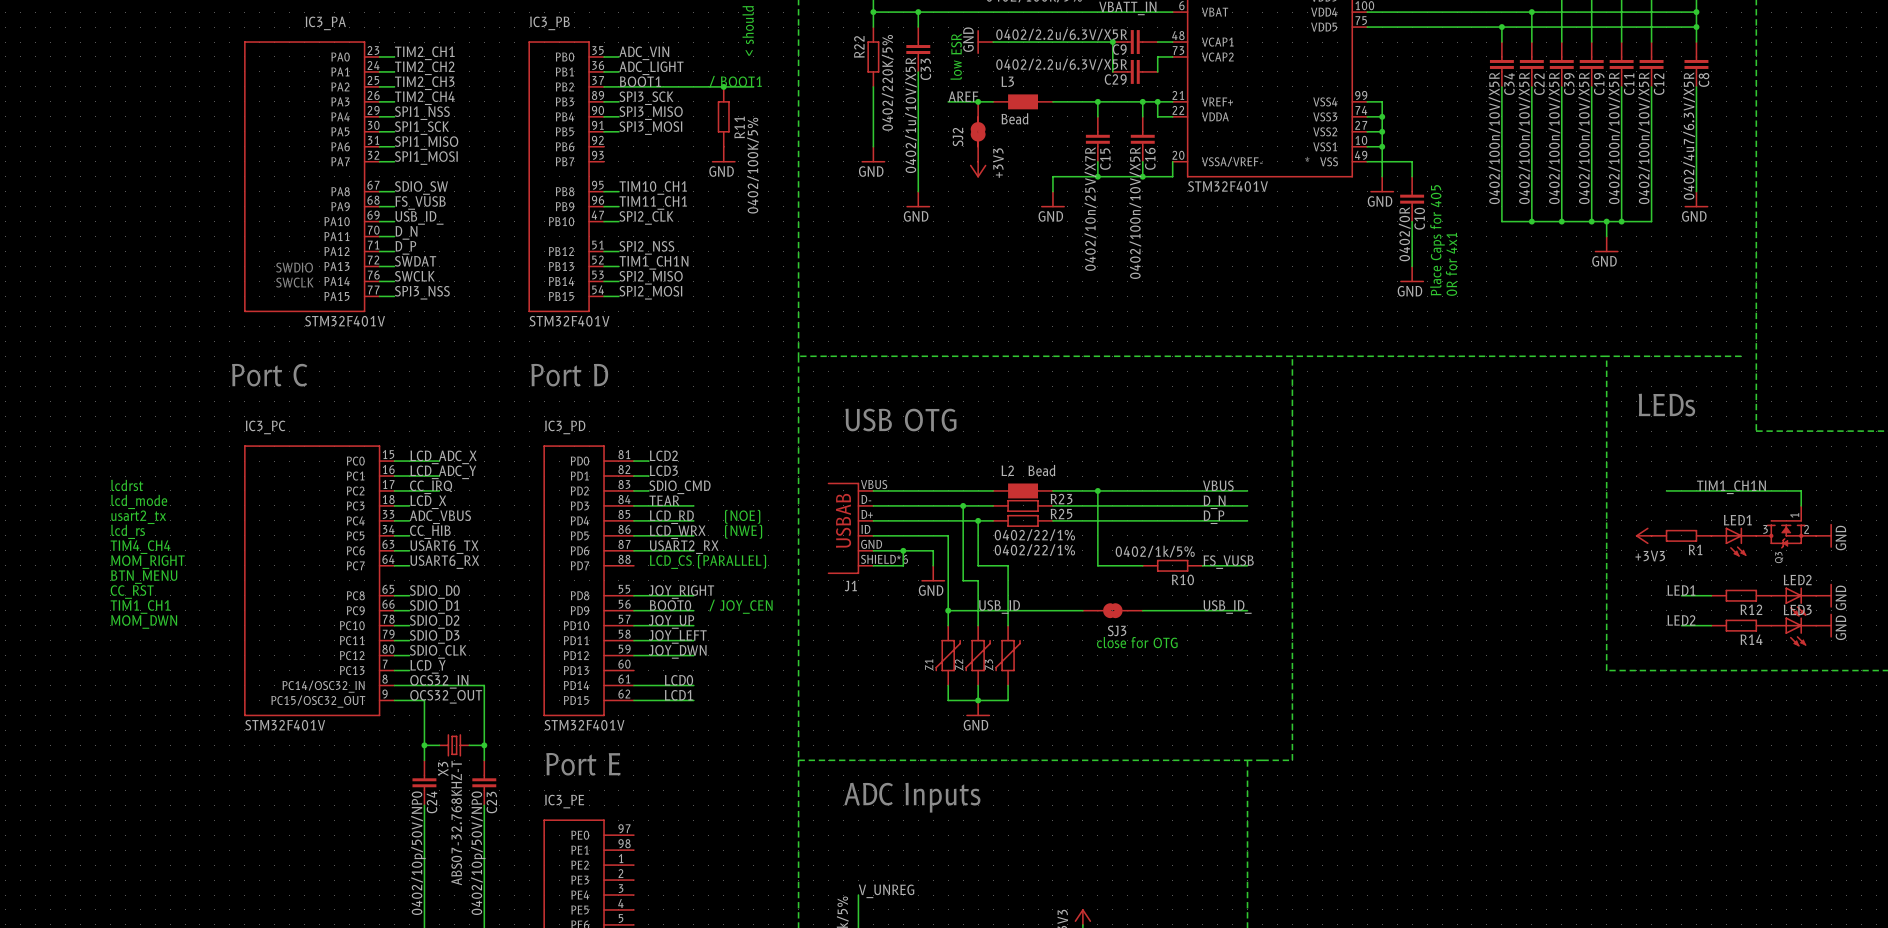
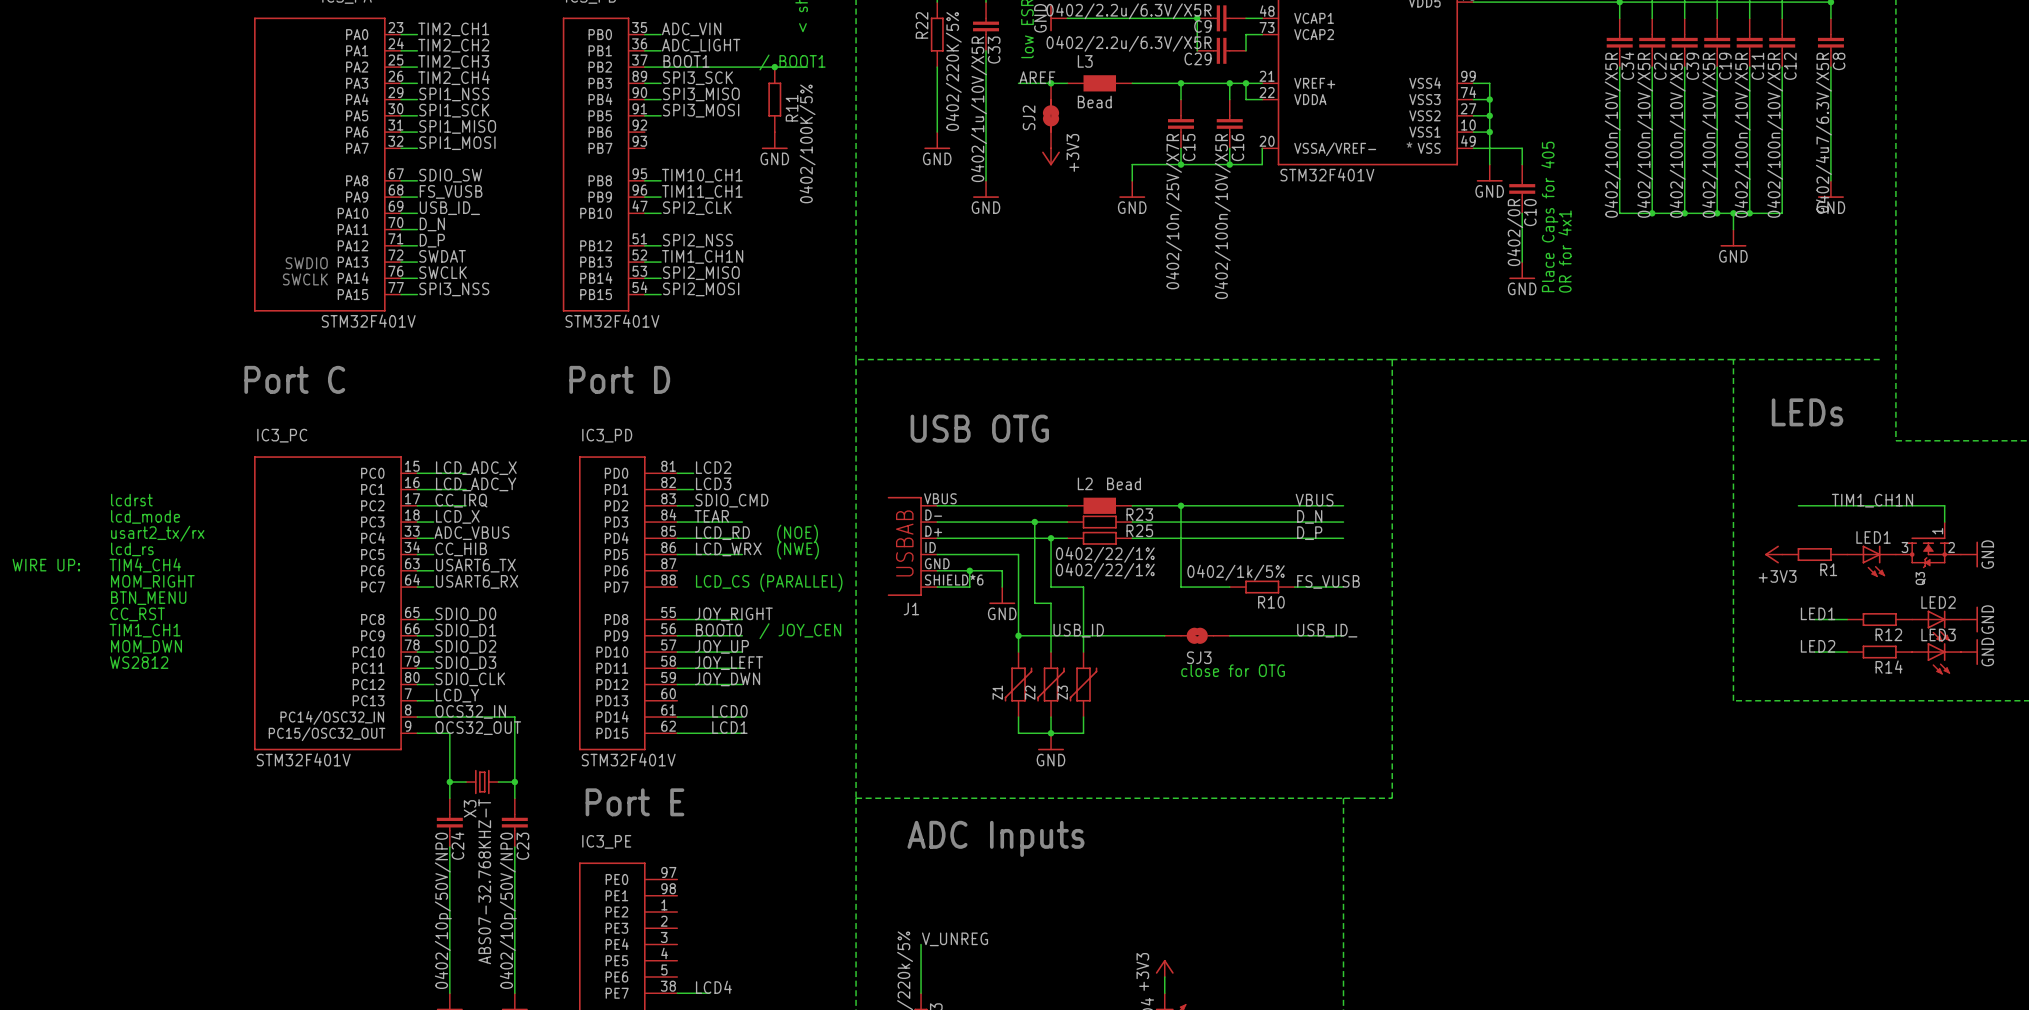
text: usart2_tx (138, 517) -> usart2_tx/rx (157, 533)
text: none -> WIRE UP: (46, 565)
label: USART2_RX (684, 547) -> none
wire: (633, 550) (693, 550) -> none
text: none -> WS2812 (139, 662)

